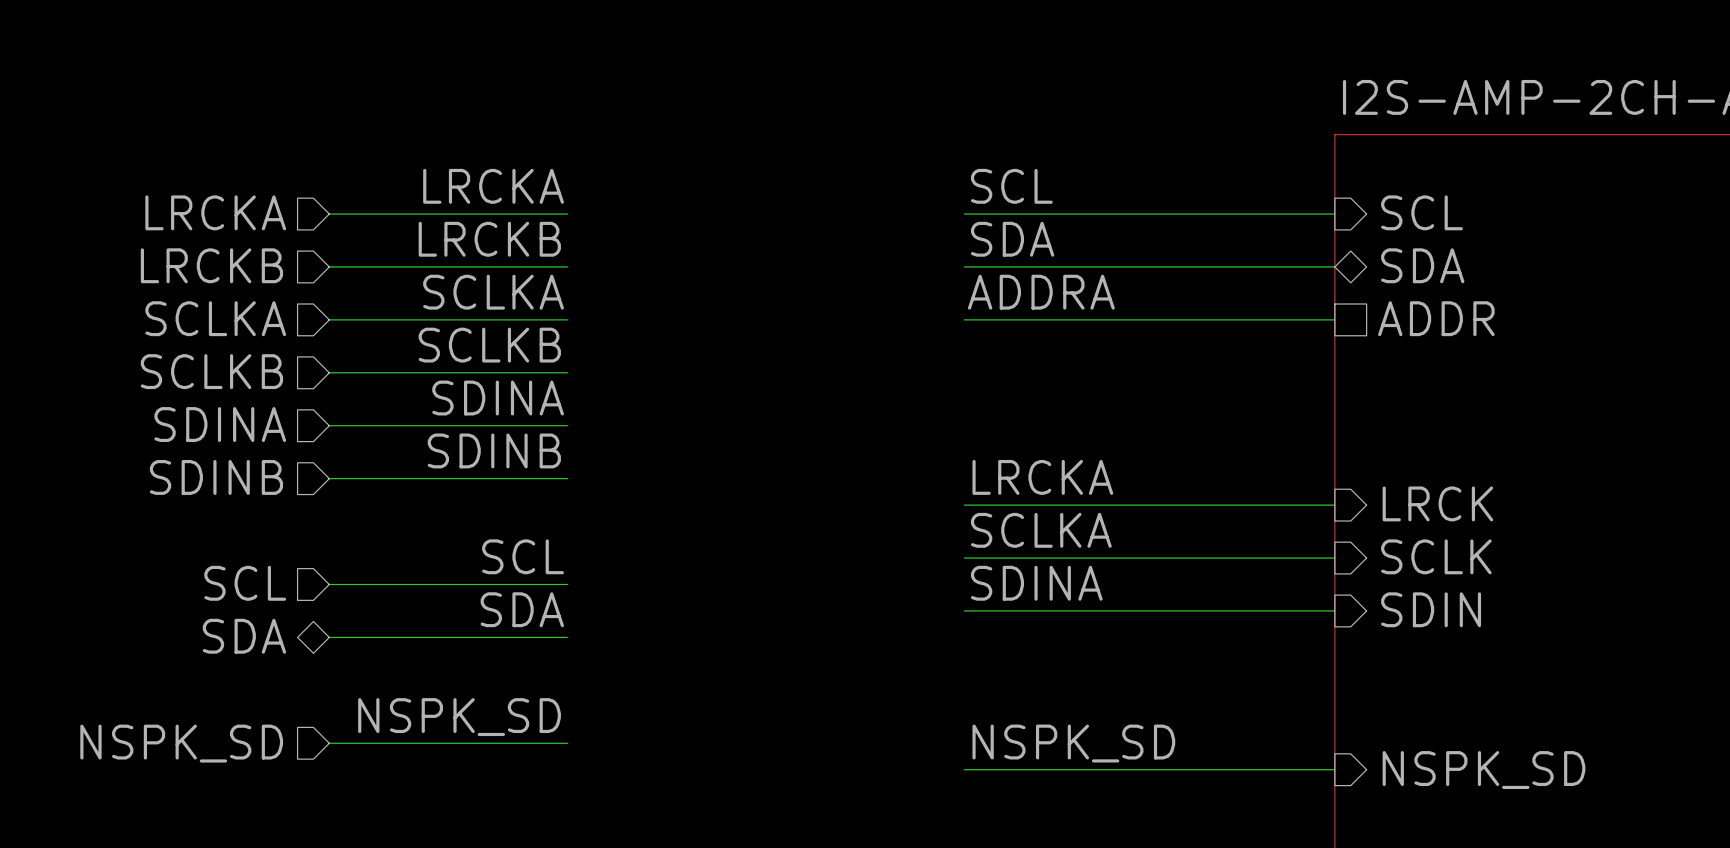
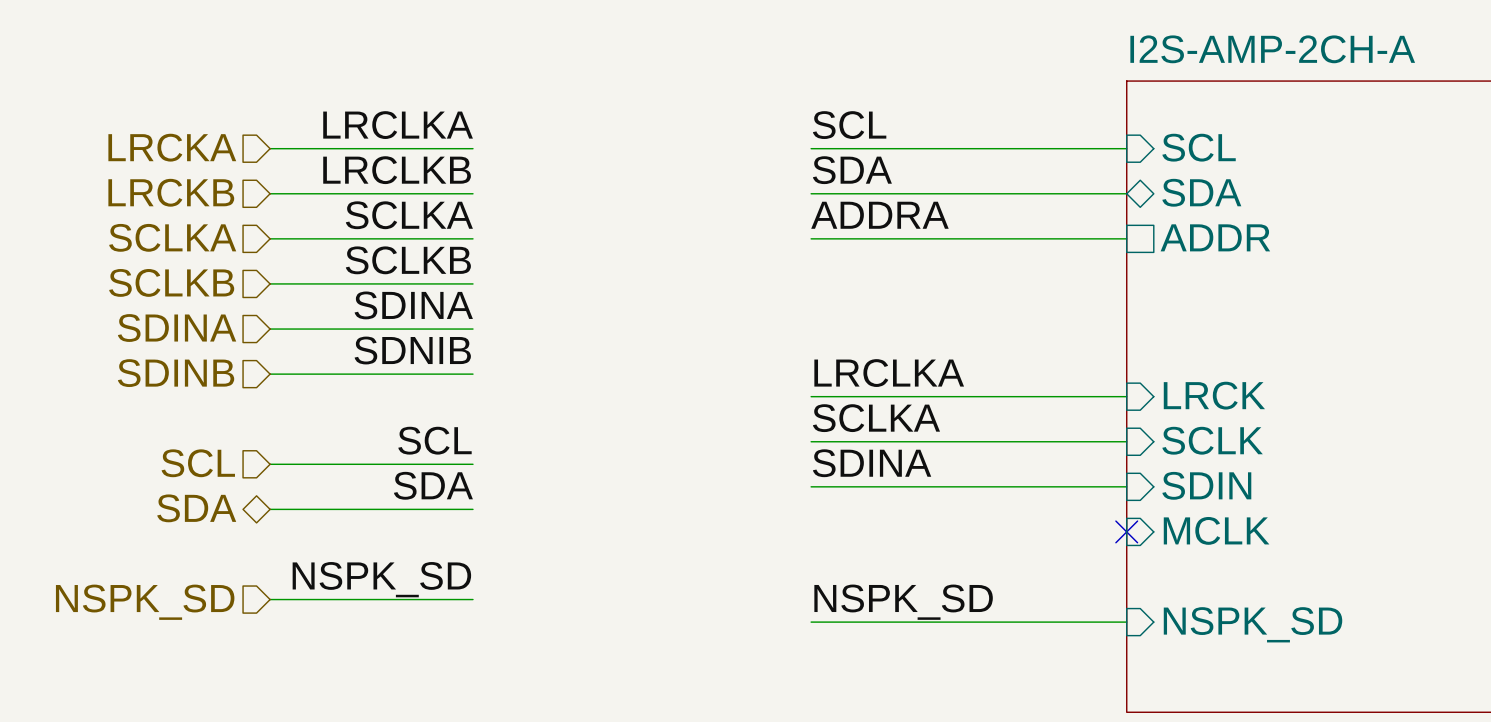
label: LRCKA (493, 186) -> LRCLKA (398, 125)
label: LRCKB (489, 239) -> LRCLKB (397, 170)
label: SDINB (494, 450) -> SDNIB (412, 350)
label: LRCKA (1042, 477) -> LRCLKA (889, 373)
sheet pin: none -> MCLK (1216, 530)
no-connect mark: none -> (1126, 531)

